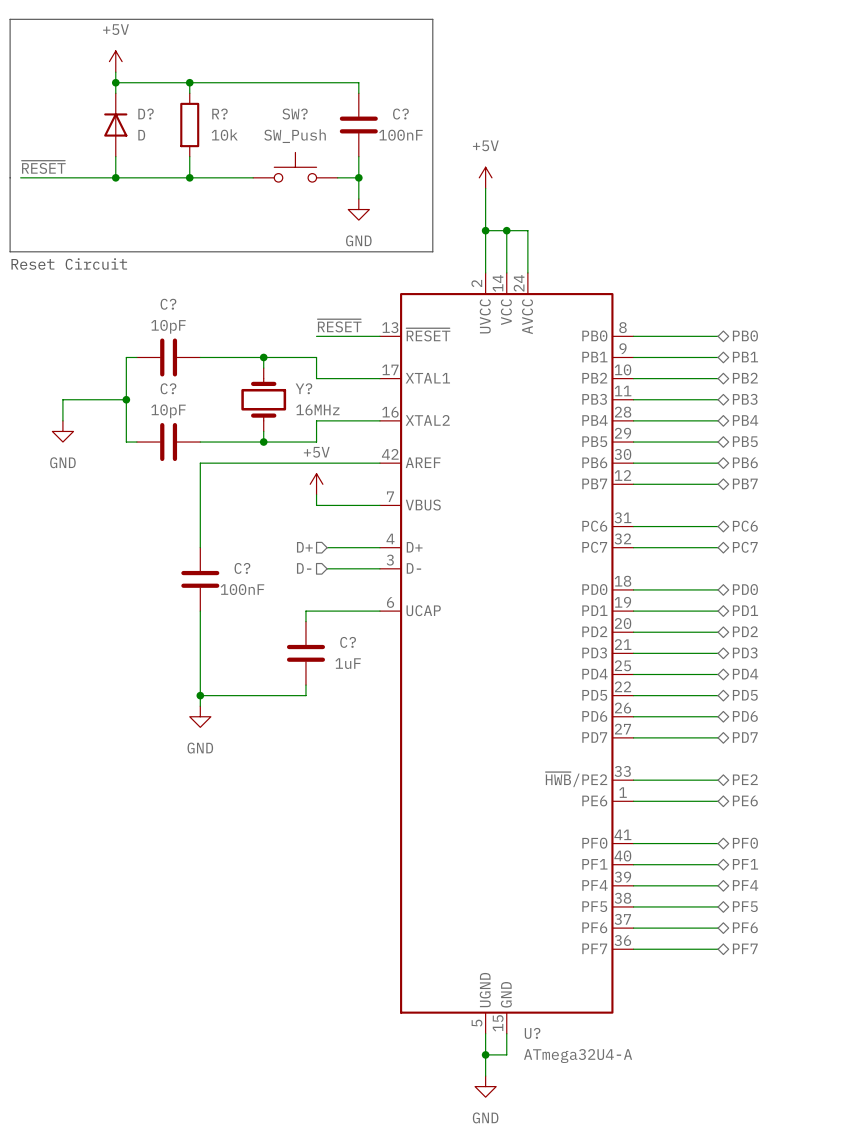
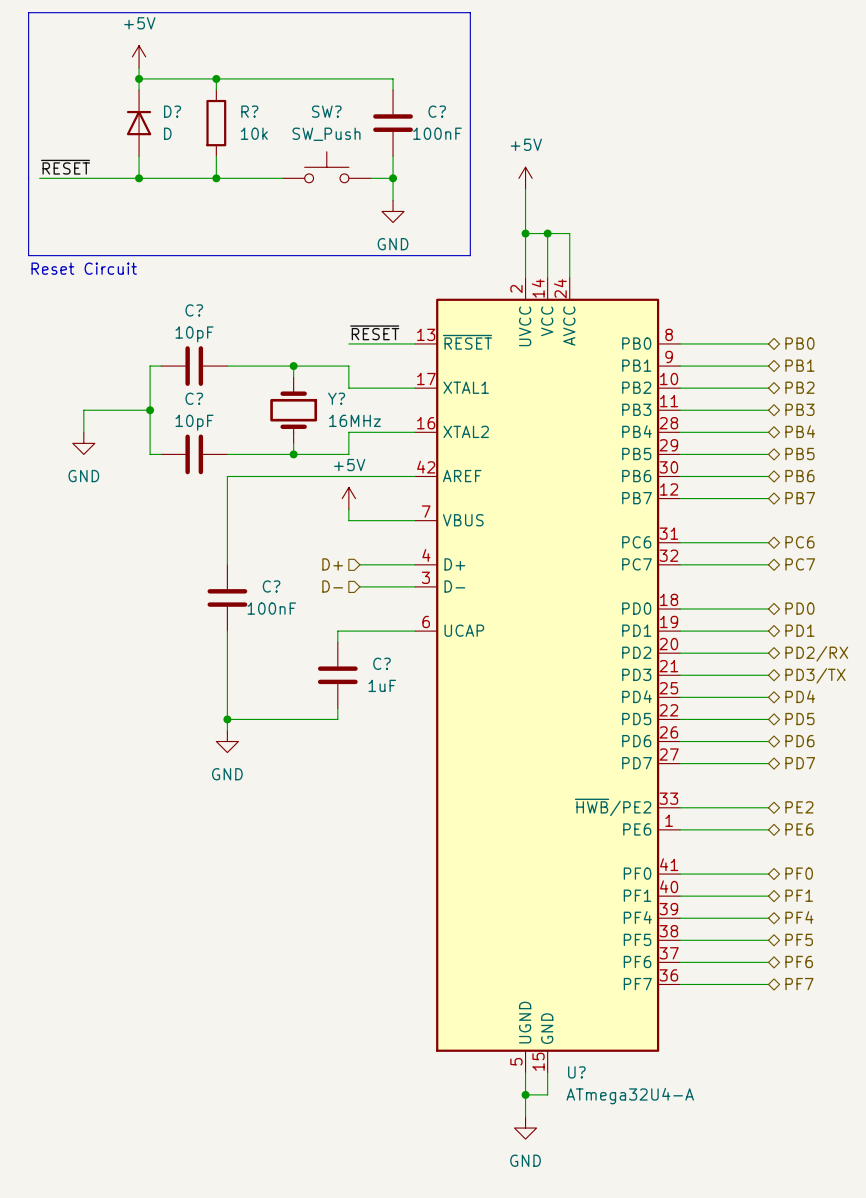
hierarchical label: PD2 (745, 631) -> PD2/RX (816, 653)
hierarchical label: PD3 (745, 652) -> PD3/TX (815, 675)

